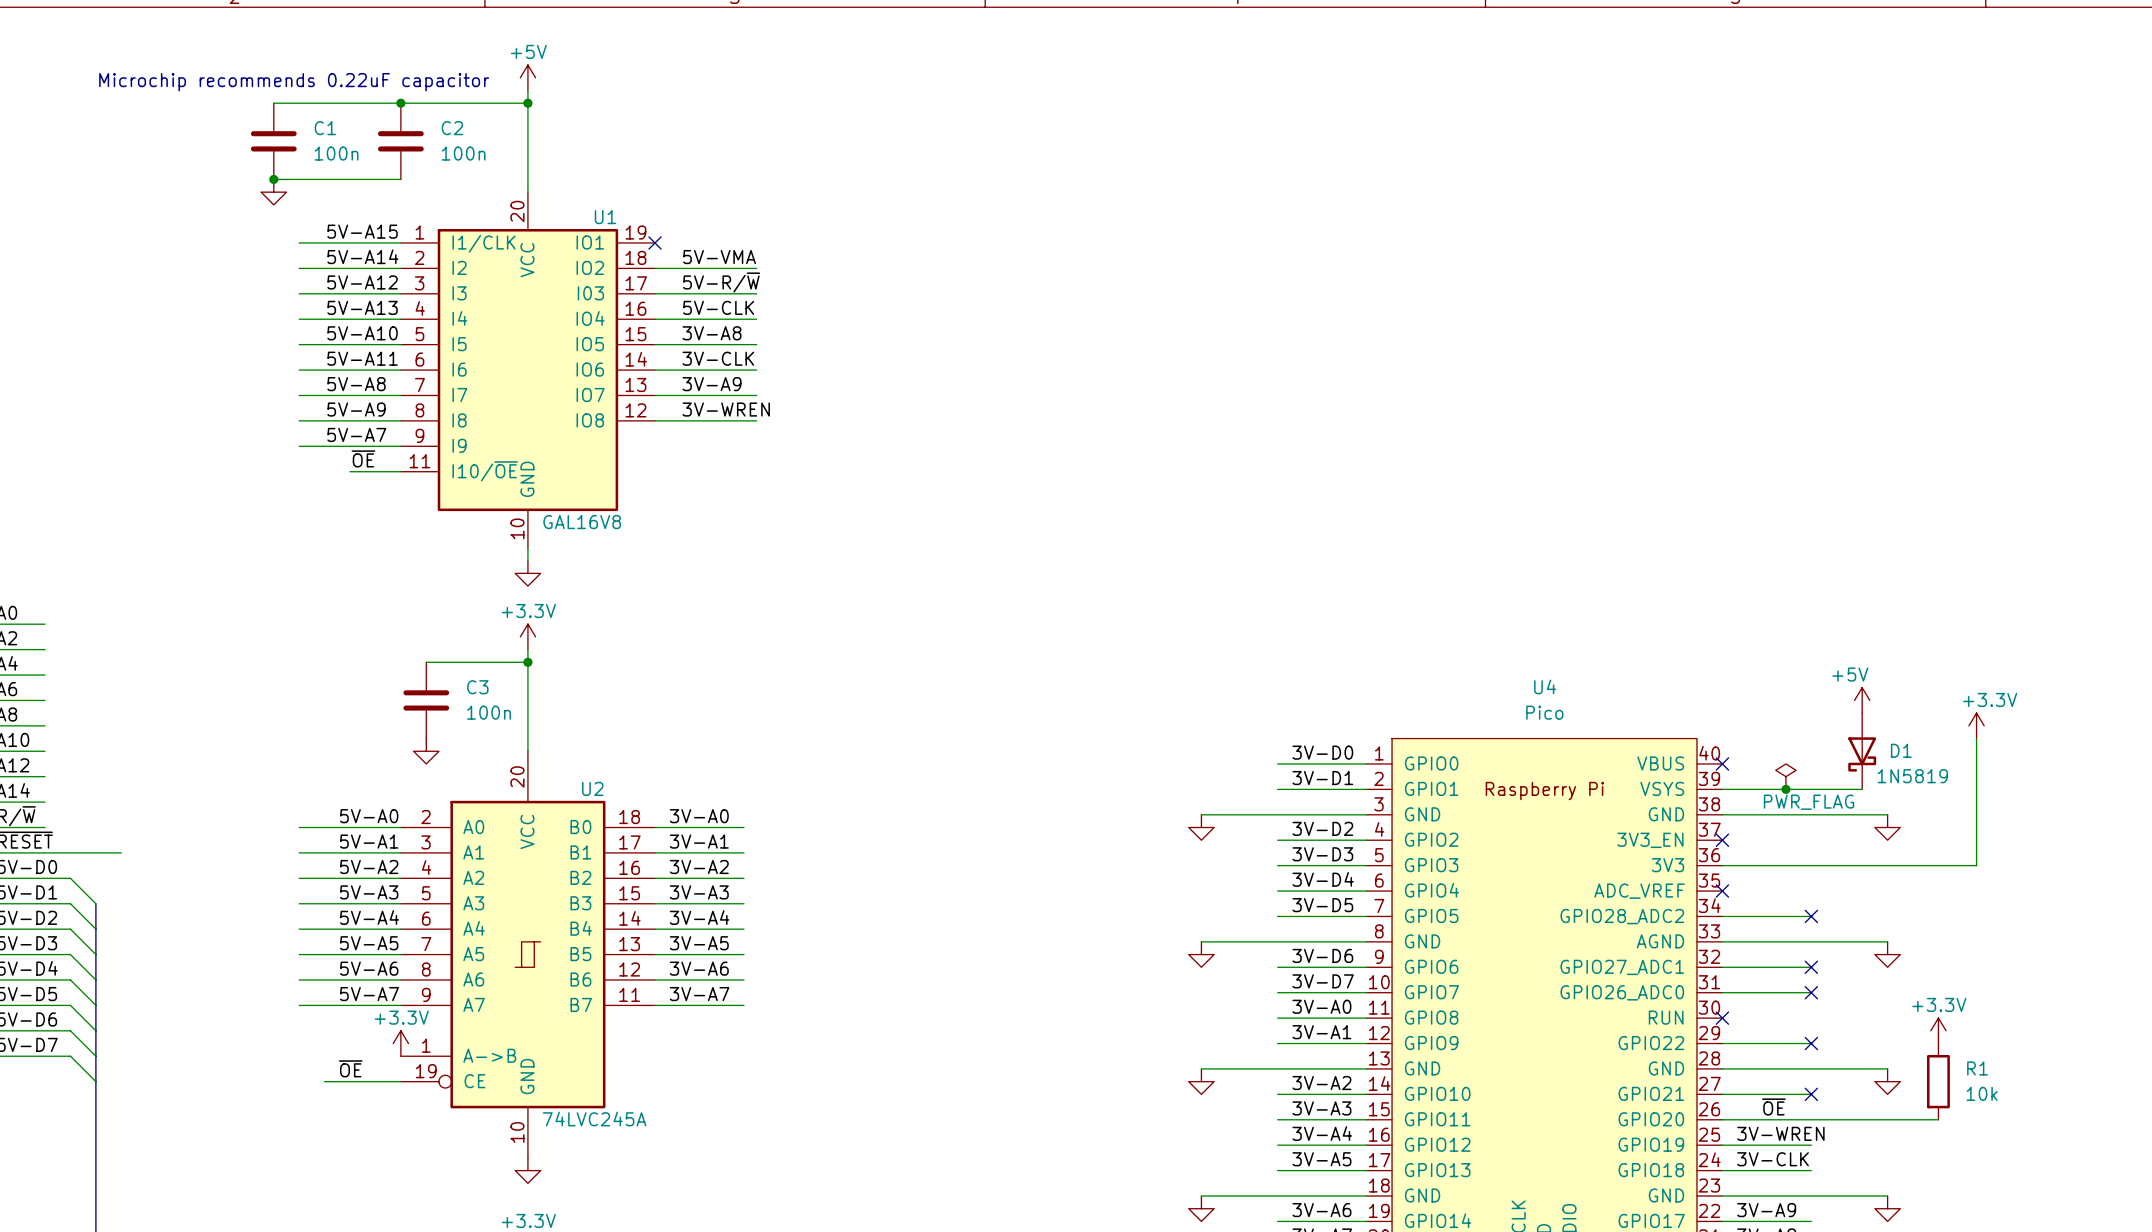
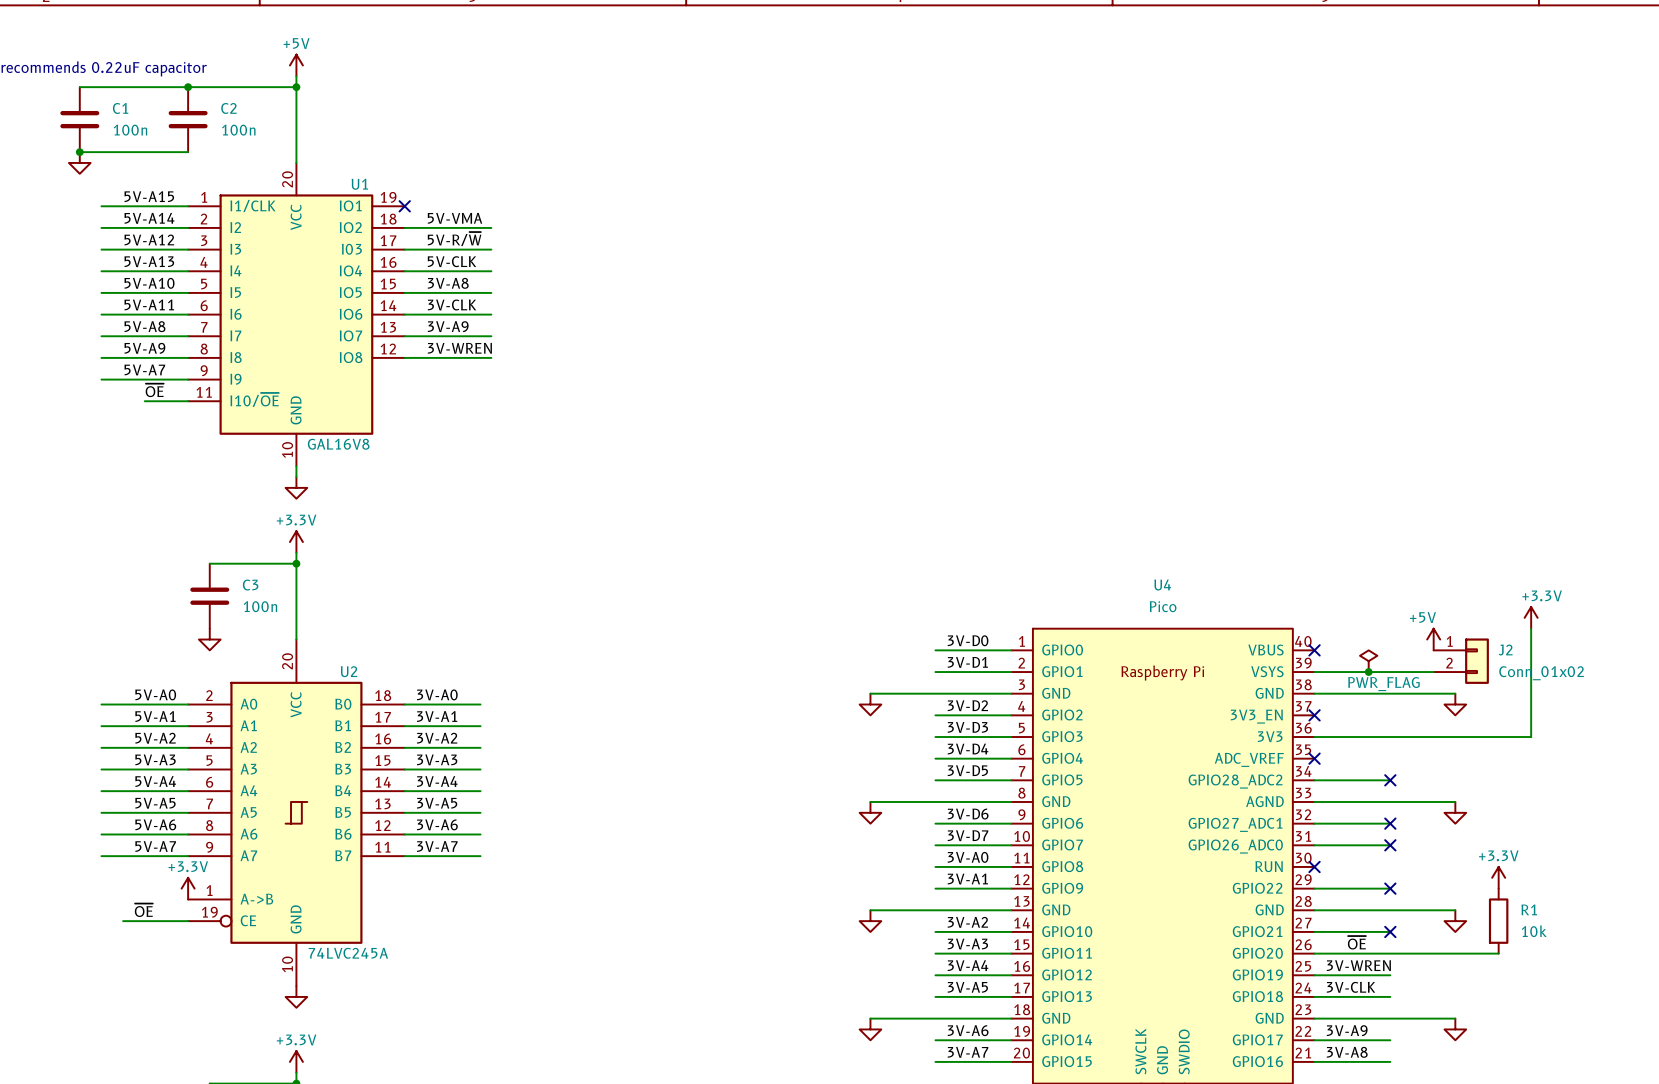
power symbol position: +5V (1862, 700) -> +5V (1433, 639)
D1: 1N5819 (1862, 751) -> none
J2: none -> Conn_01x02 (1461, 661)

